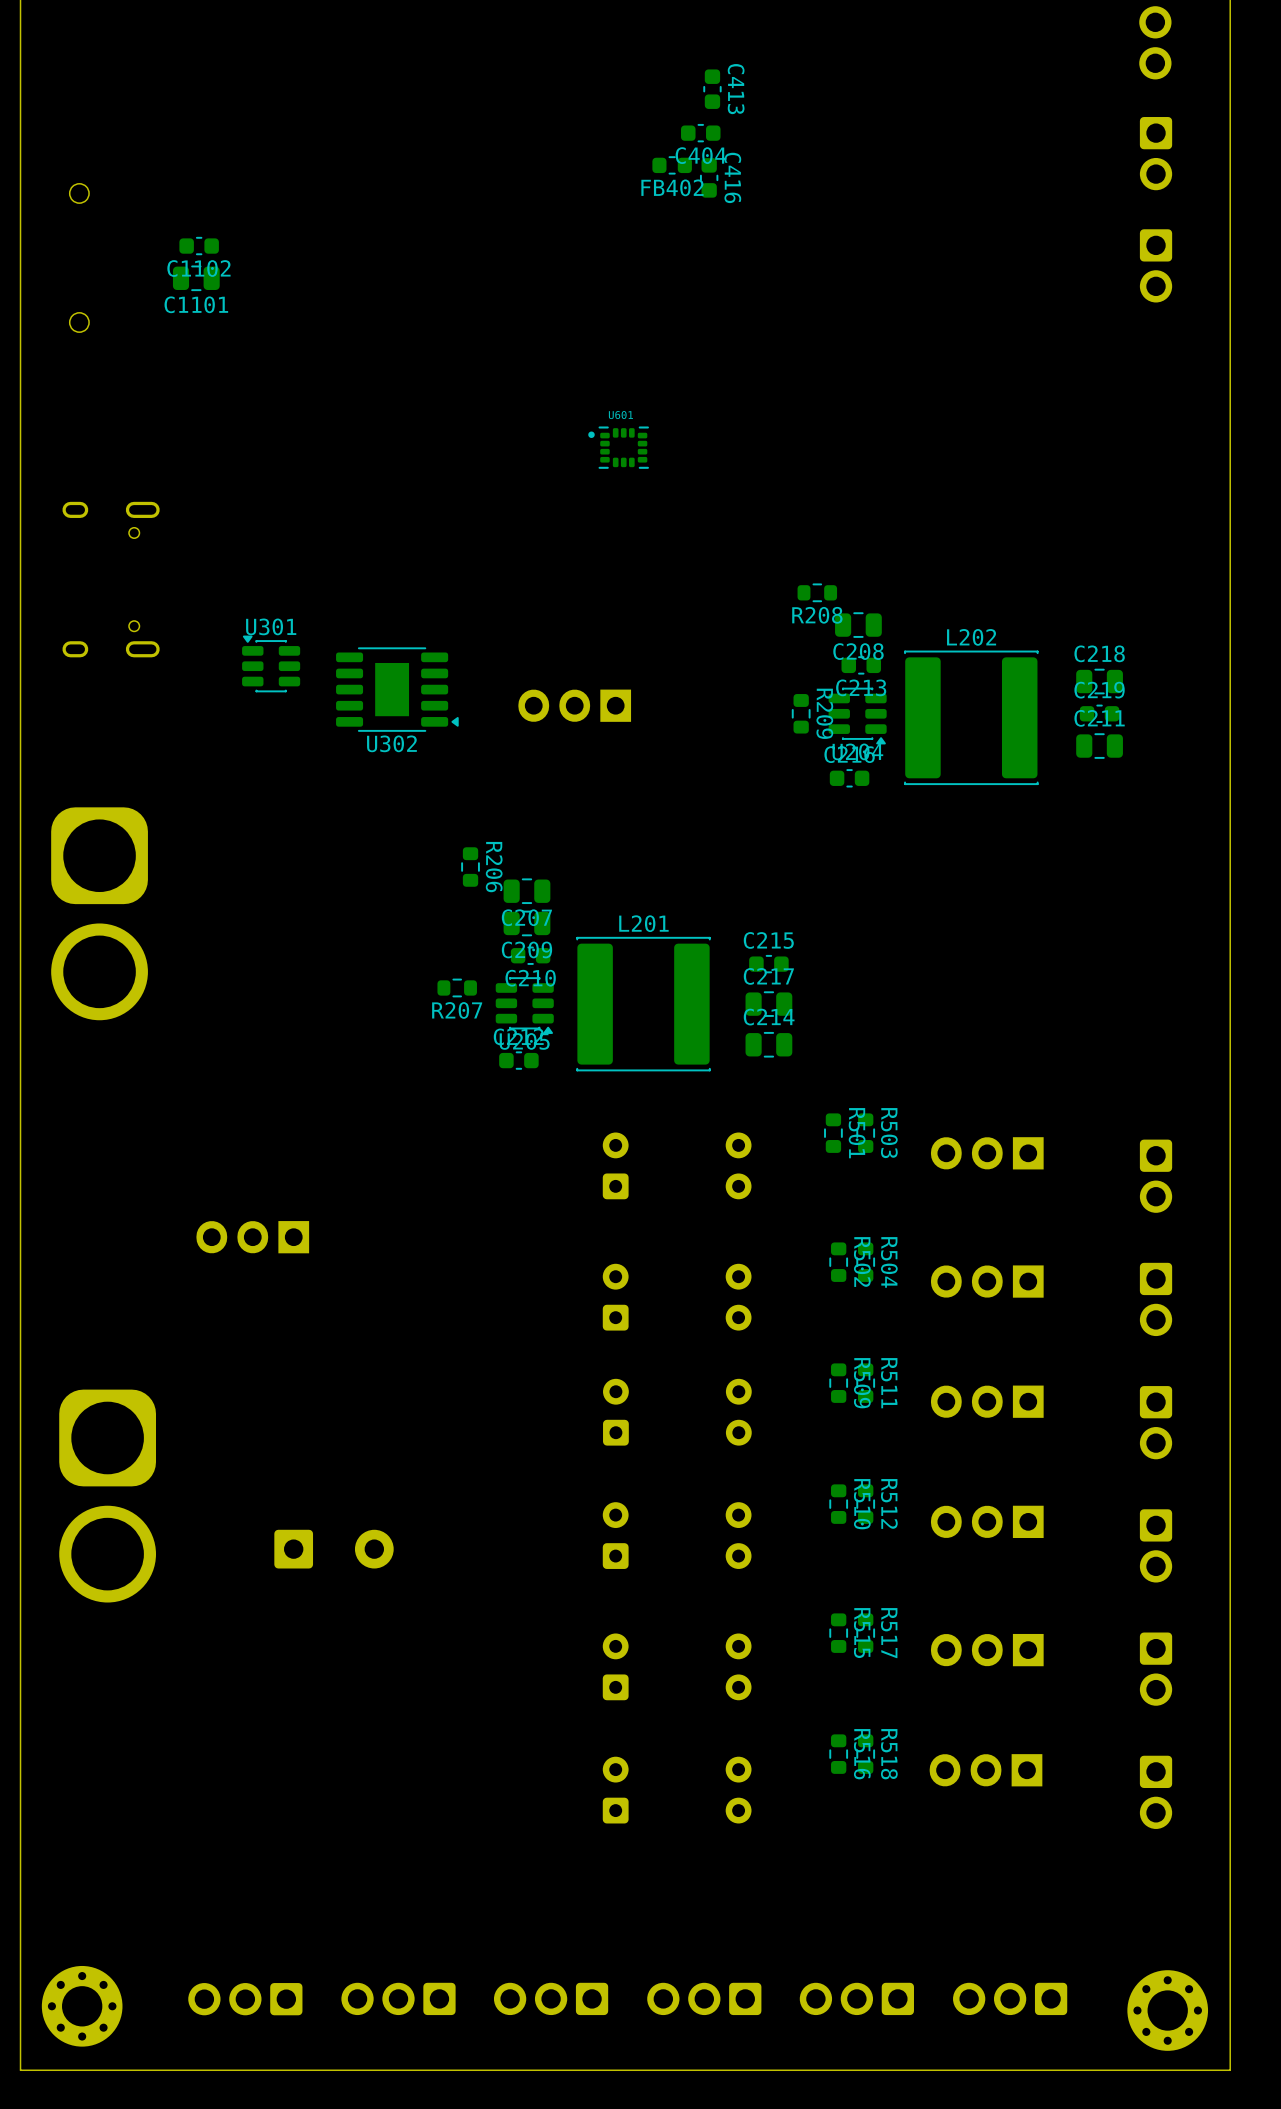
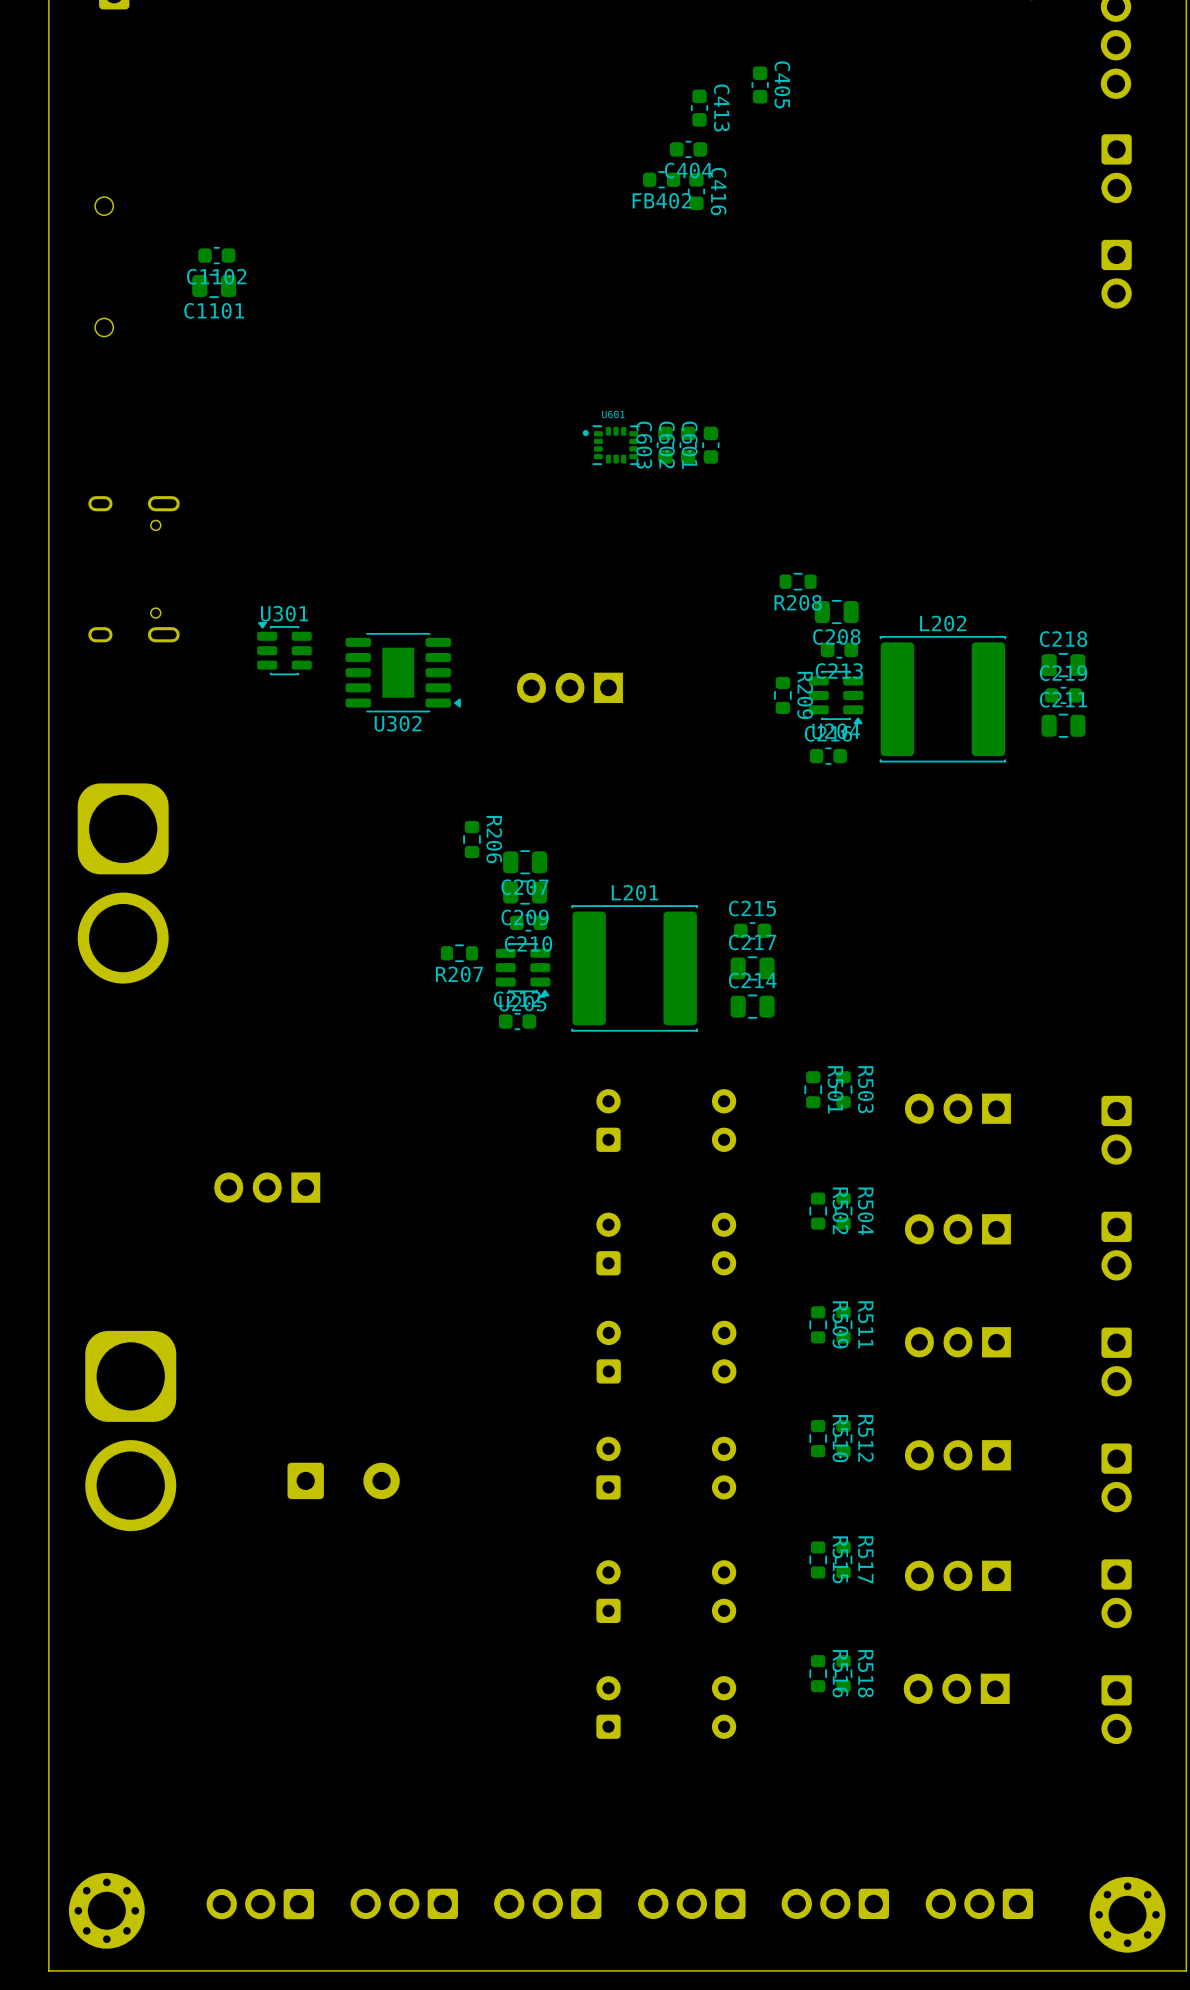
C405: none -> (760, 84)
C603: none -> (665, 445)
C602: none -> (688, 445)
C601: none -> (710, 445)

